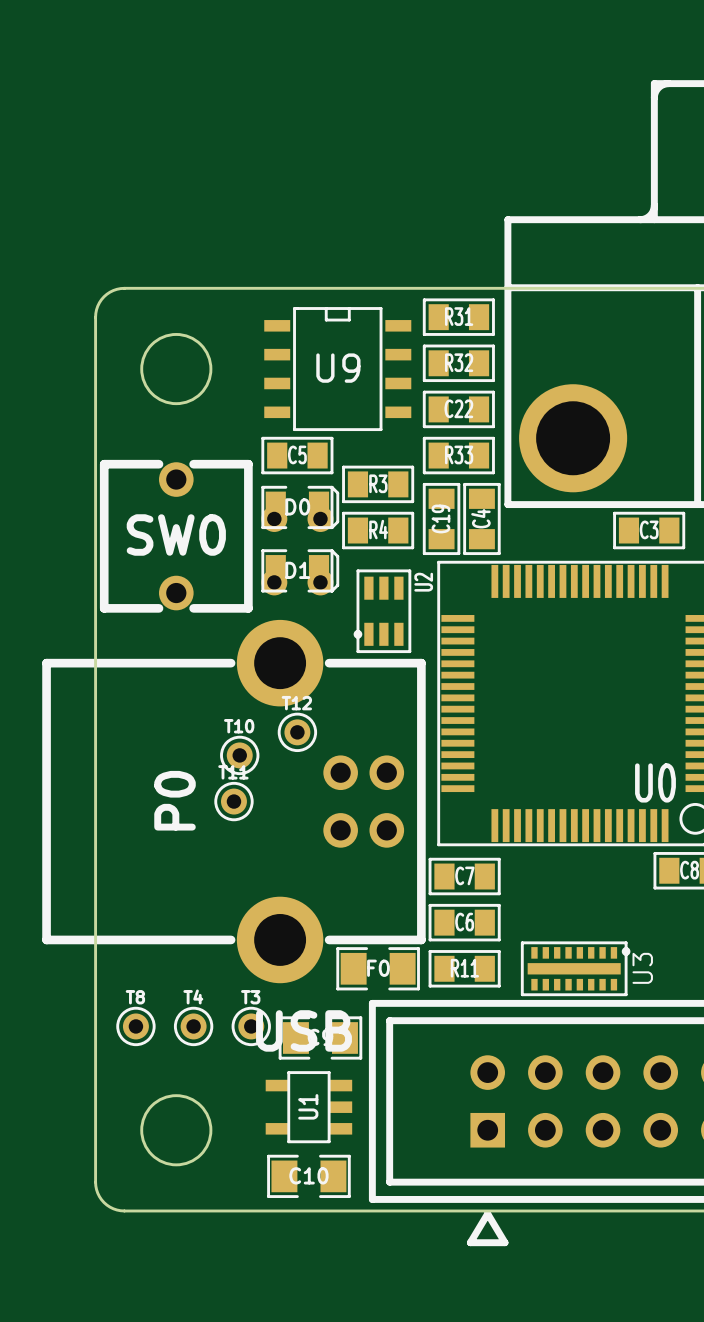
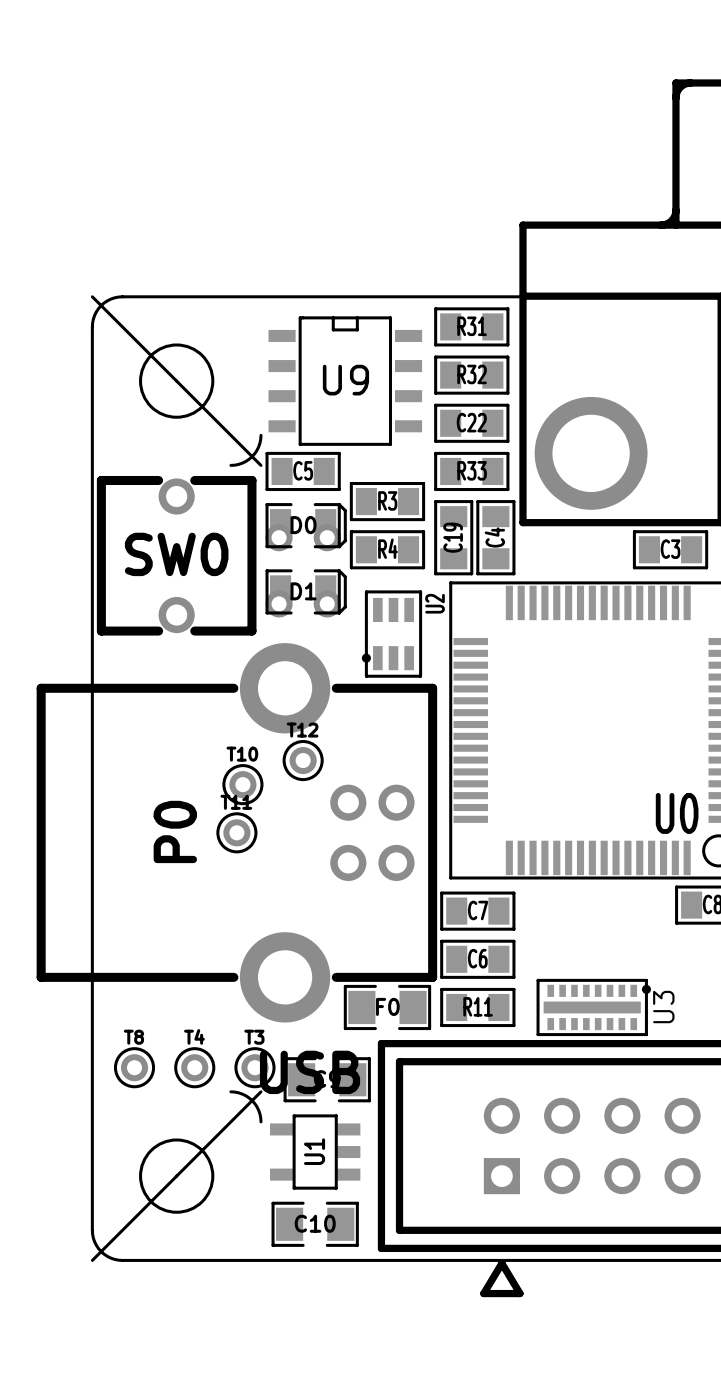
board edge: none -> (92, 296) (260, 465)
board edge: none -> (260, 435) (258, 446) (252, 456) (242, 463) (230, 465)
board edge: none -> (230, 1091) (242, 1094) (252, 1100) (258, 1110) (260, 1121)
board edge: none -> (260, 1091) (92, 1260)

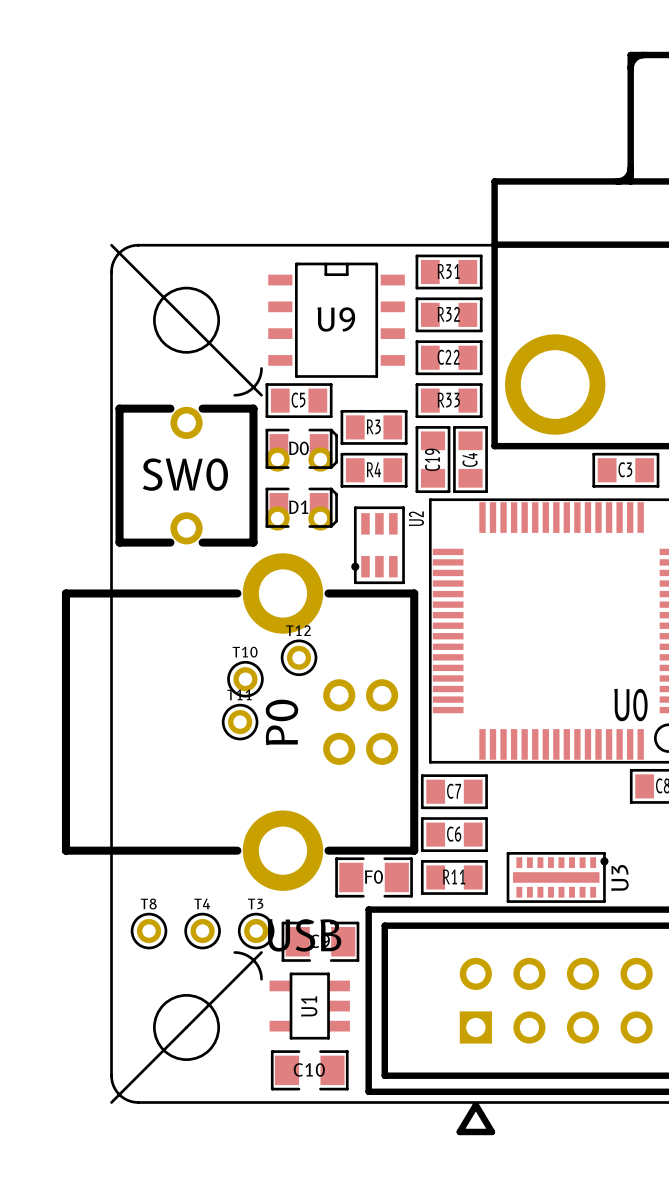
P0 name position: P0 (175, 831) -> P0 (281, 722)

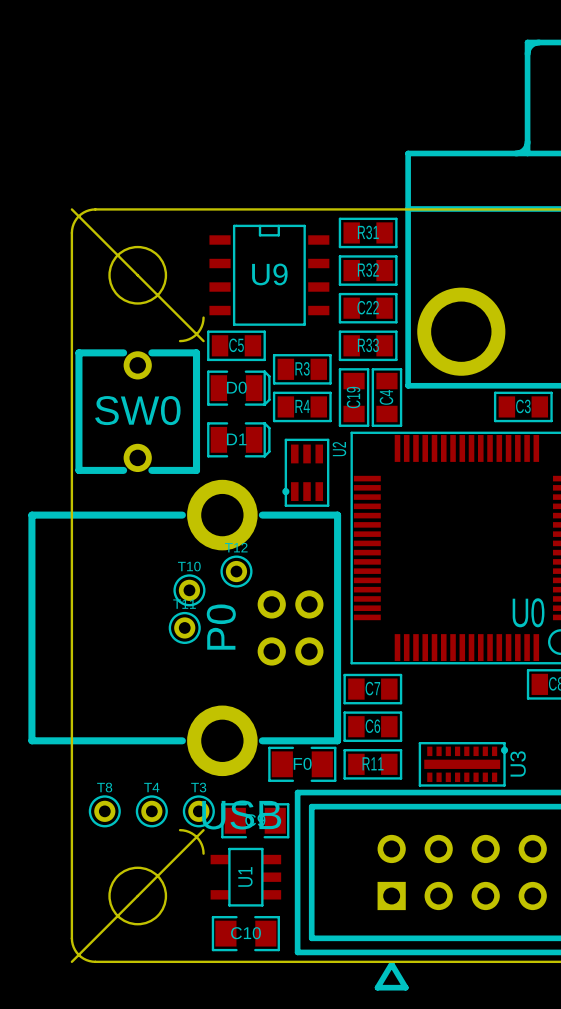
part: (277, 459) -> none
part: (320, 459) -> none
part: (277, 518) -> none
part: (320, 518) -> none

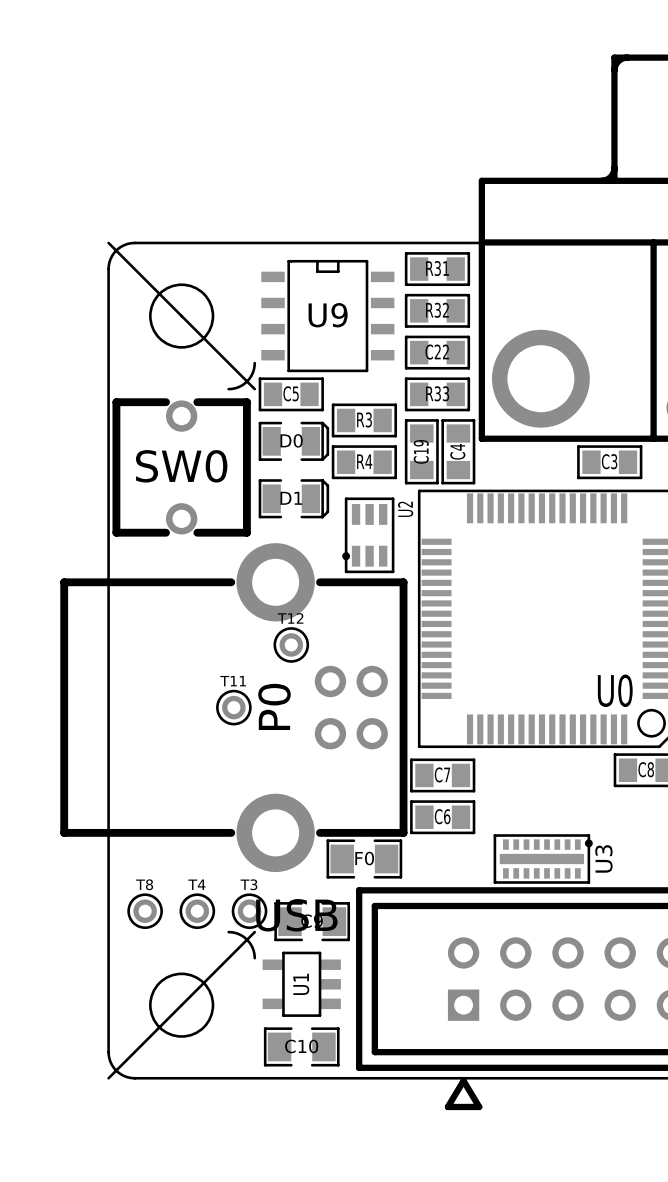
T10: (189, 590) -> none
R11: (372, 764) -> none

